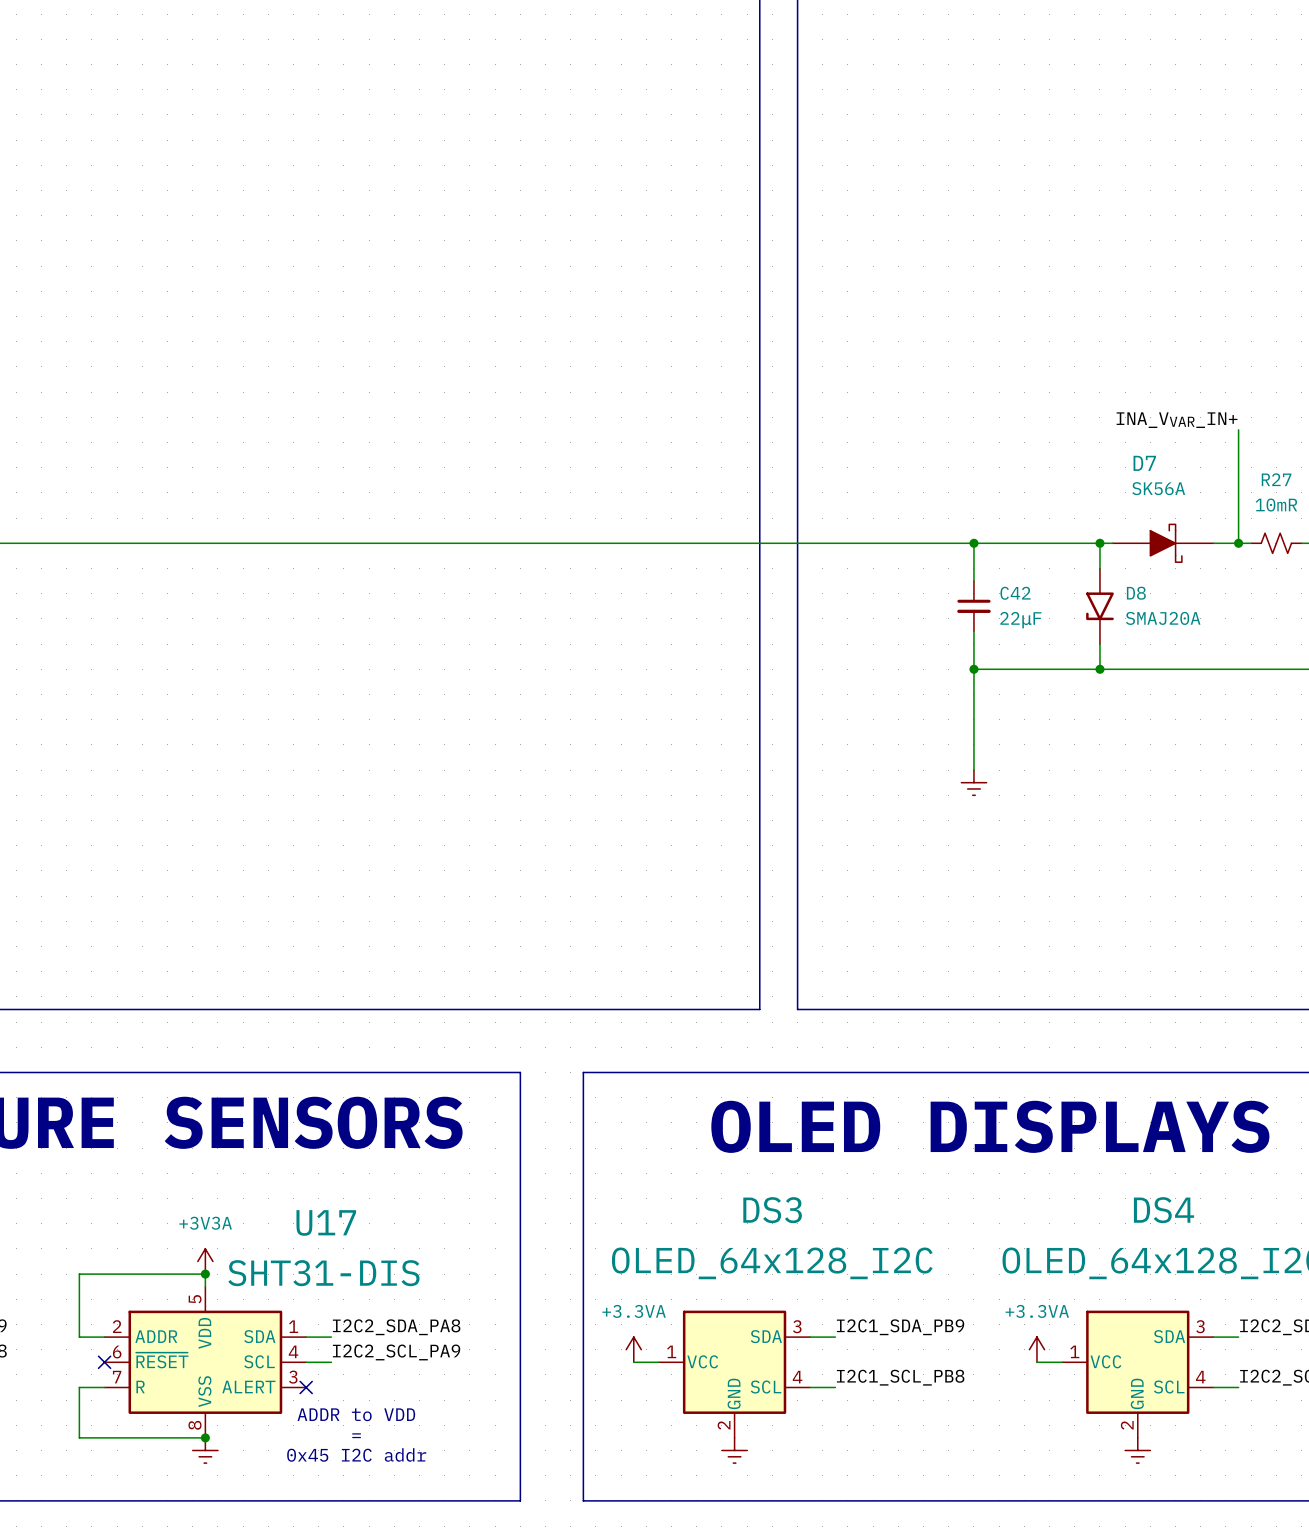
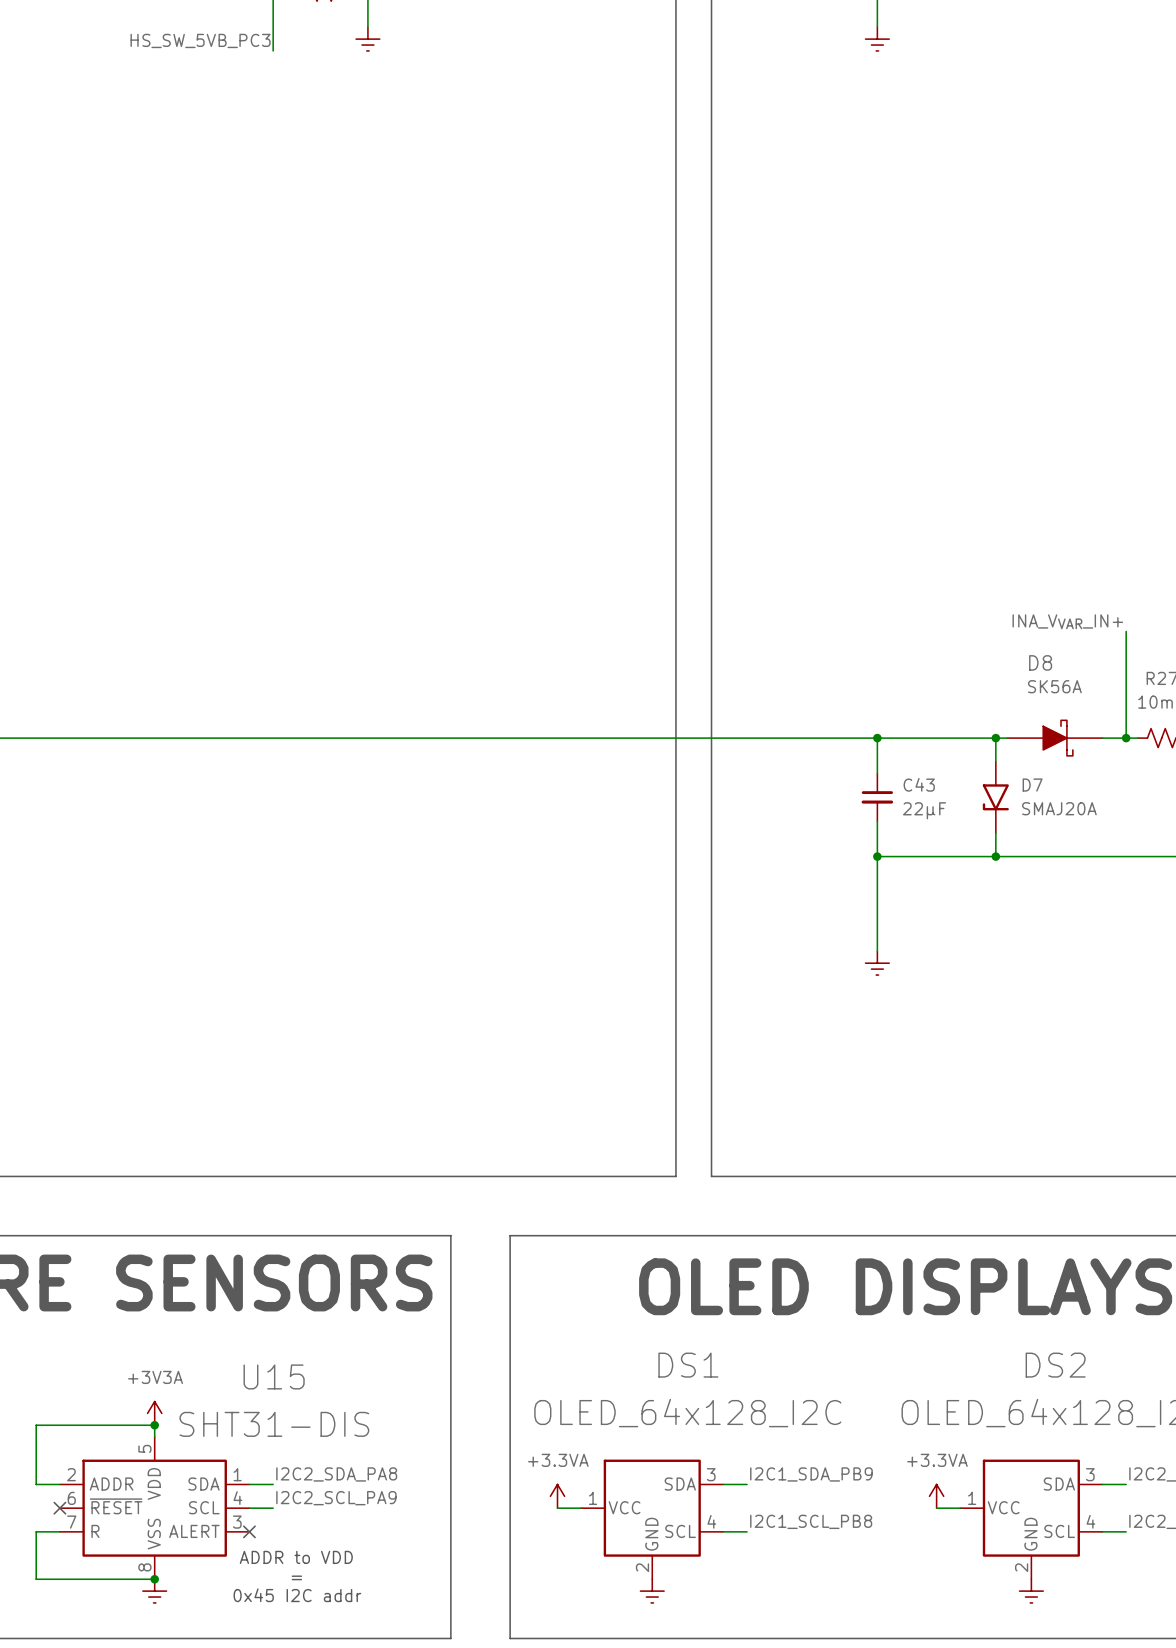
D7 name: D7 (1144, 463) -> D8 (1040, 662)
C42 name: C42 (1015, 593) -> C43 (919, 784)
D8 name: D8 (1136, 593) -> D7 (1032, 785)
DS3 name: DS3 (772, 1210) -> DS1 (688, 1365)
DS4 name: DS4 (1164, 1210) -> DS2 (1055, 1365)
U17 name: U17 (326, 1222) -> U15 (274, 1376)

